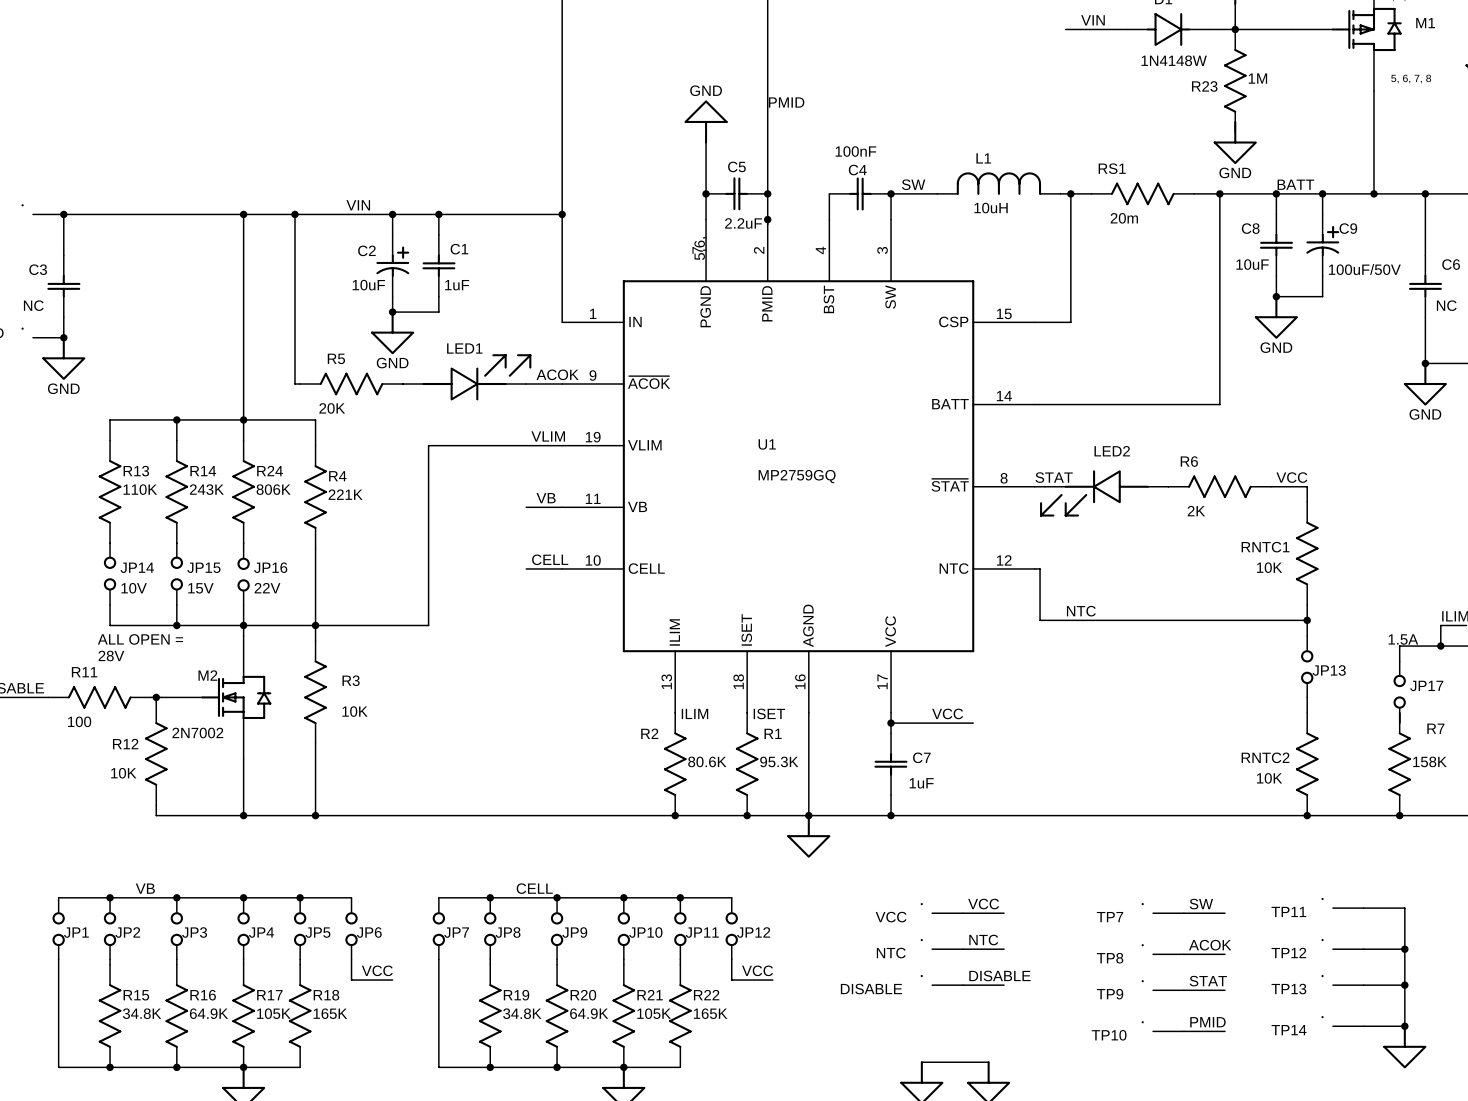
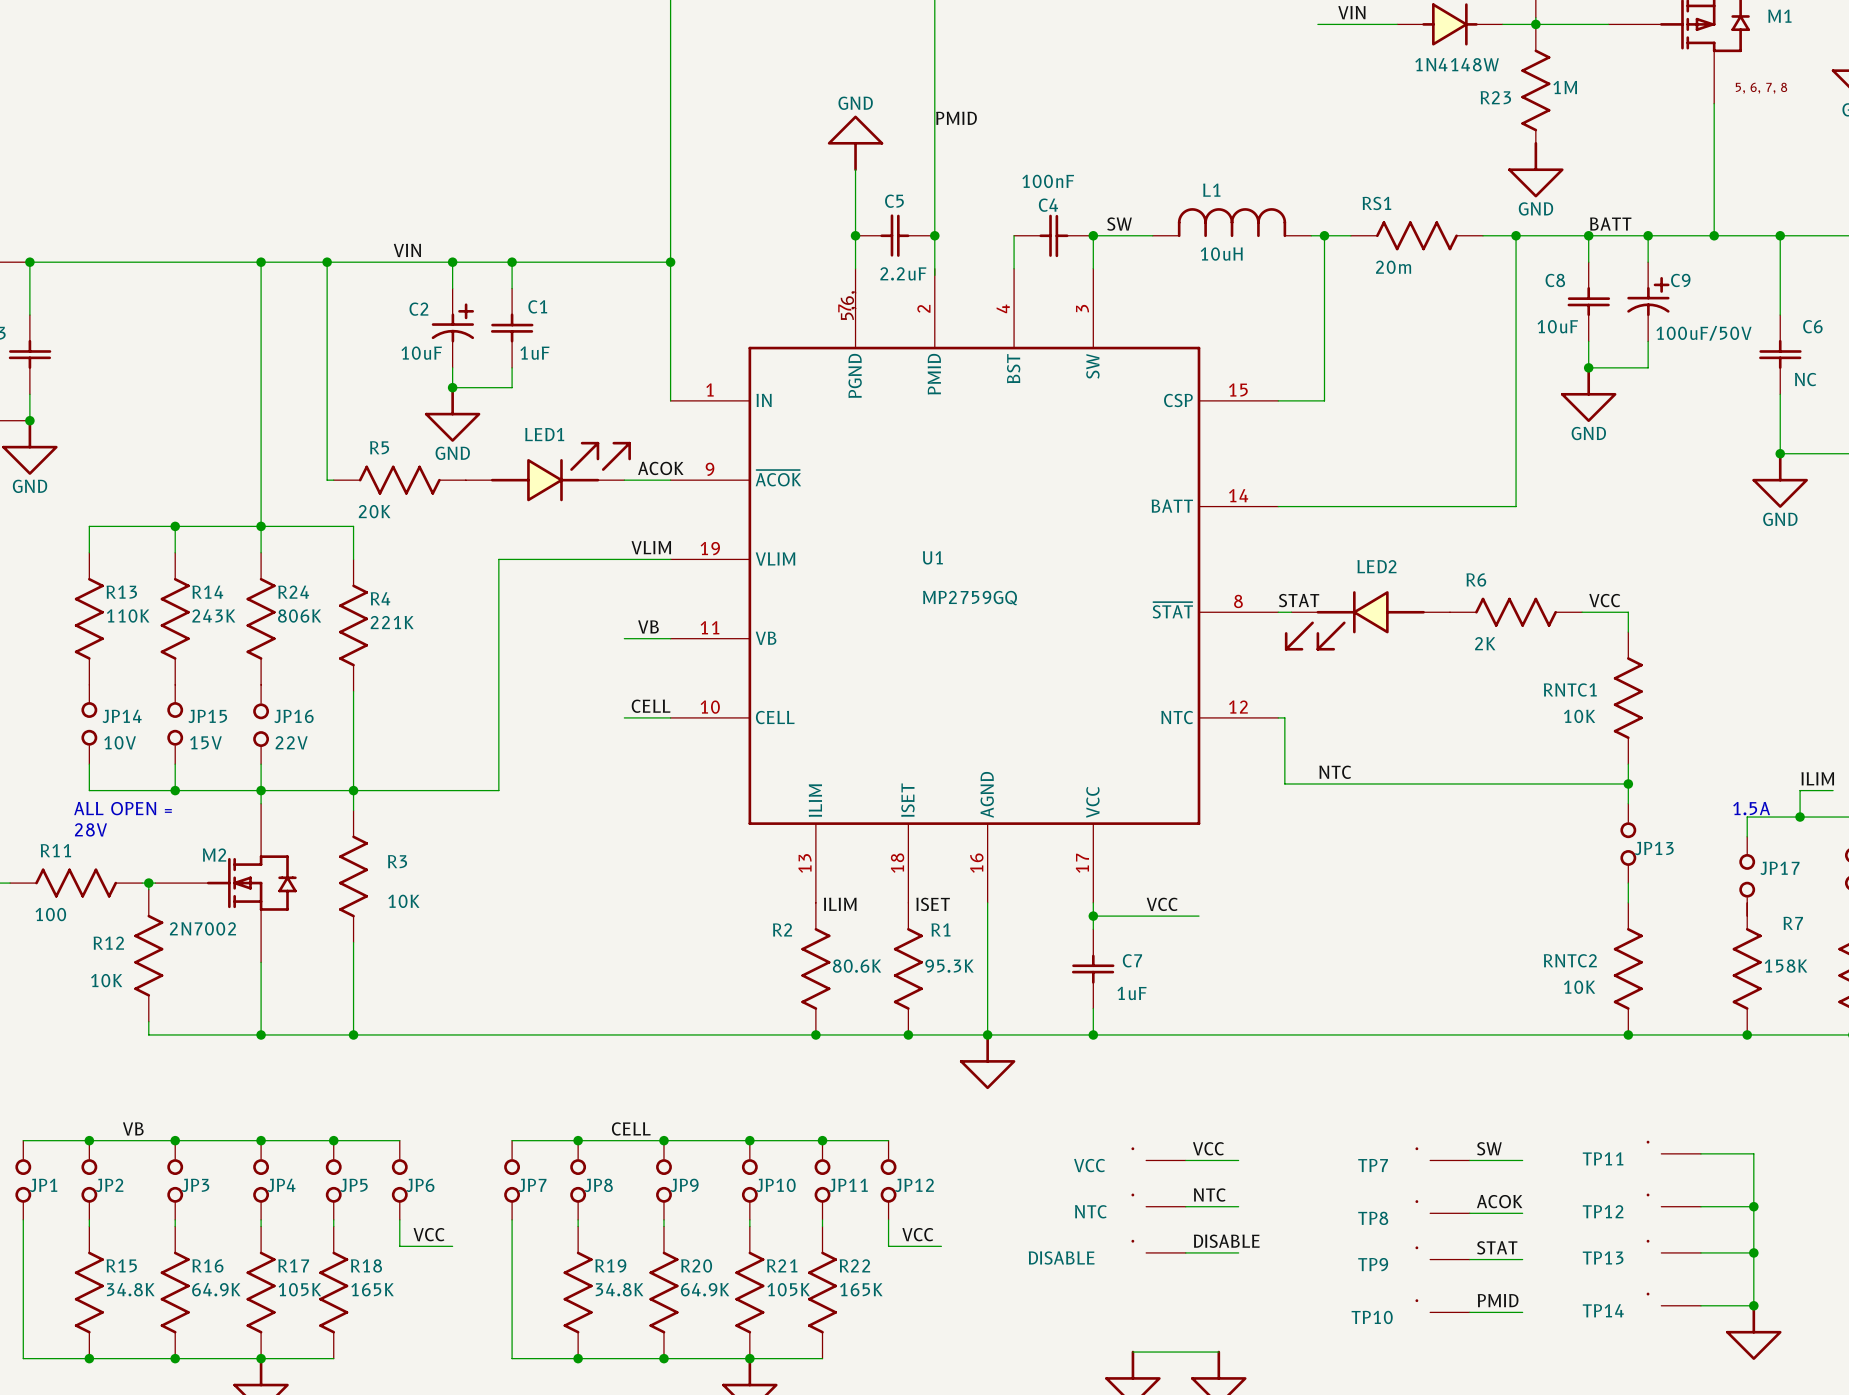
junction: (767, 219) -> none

